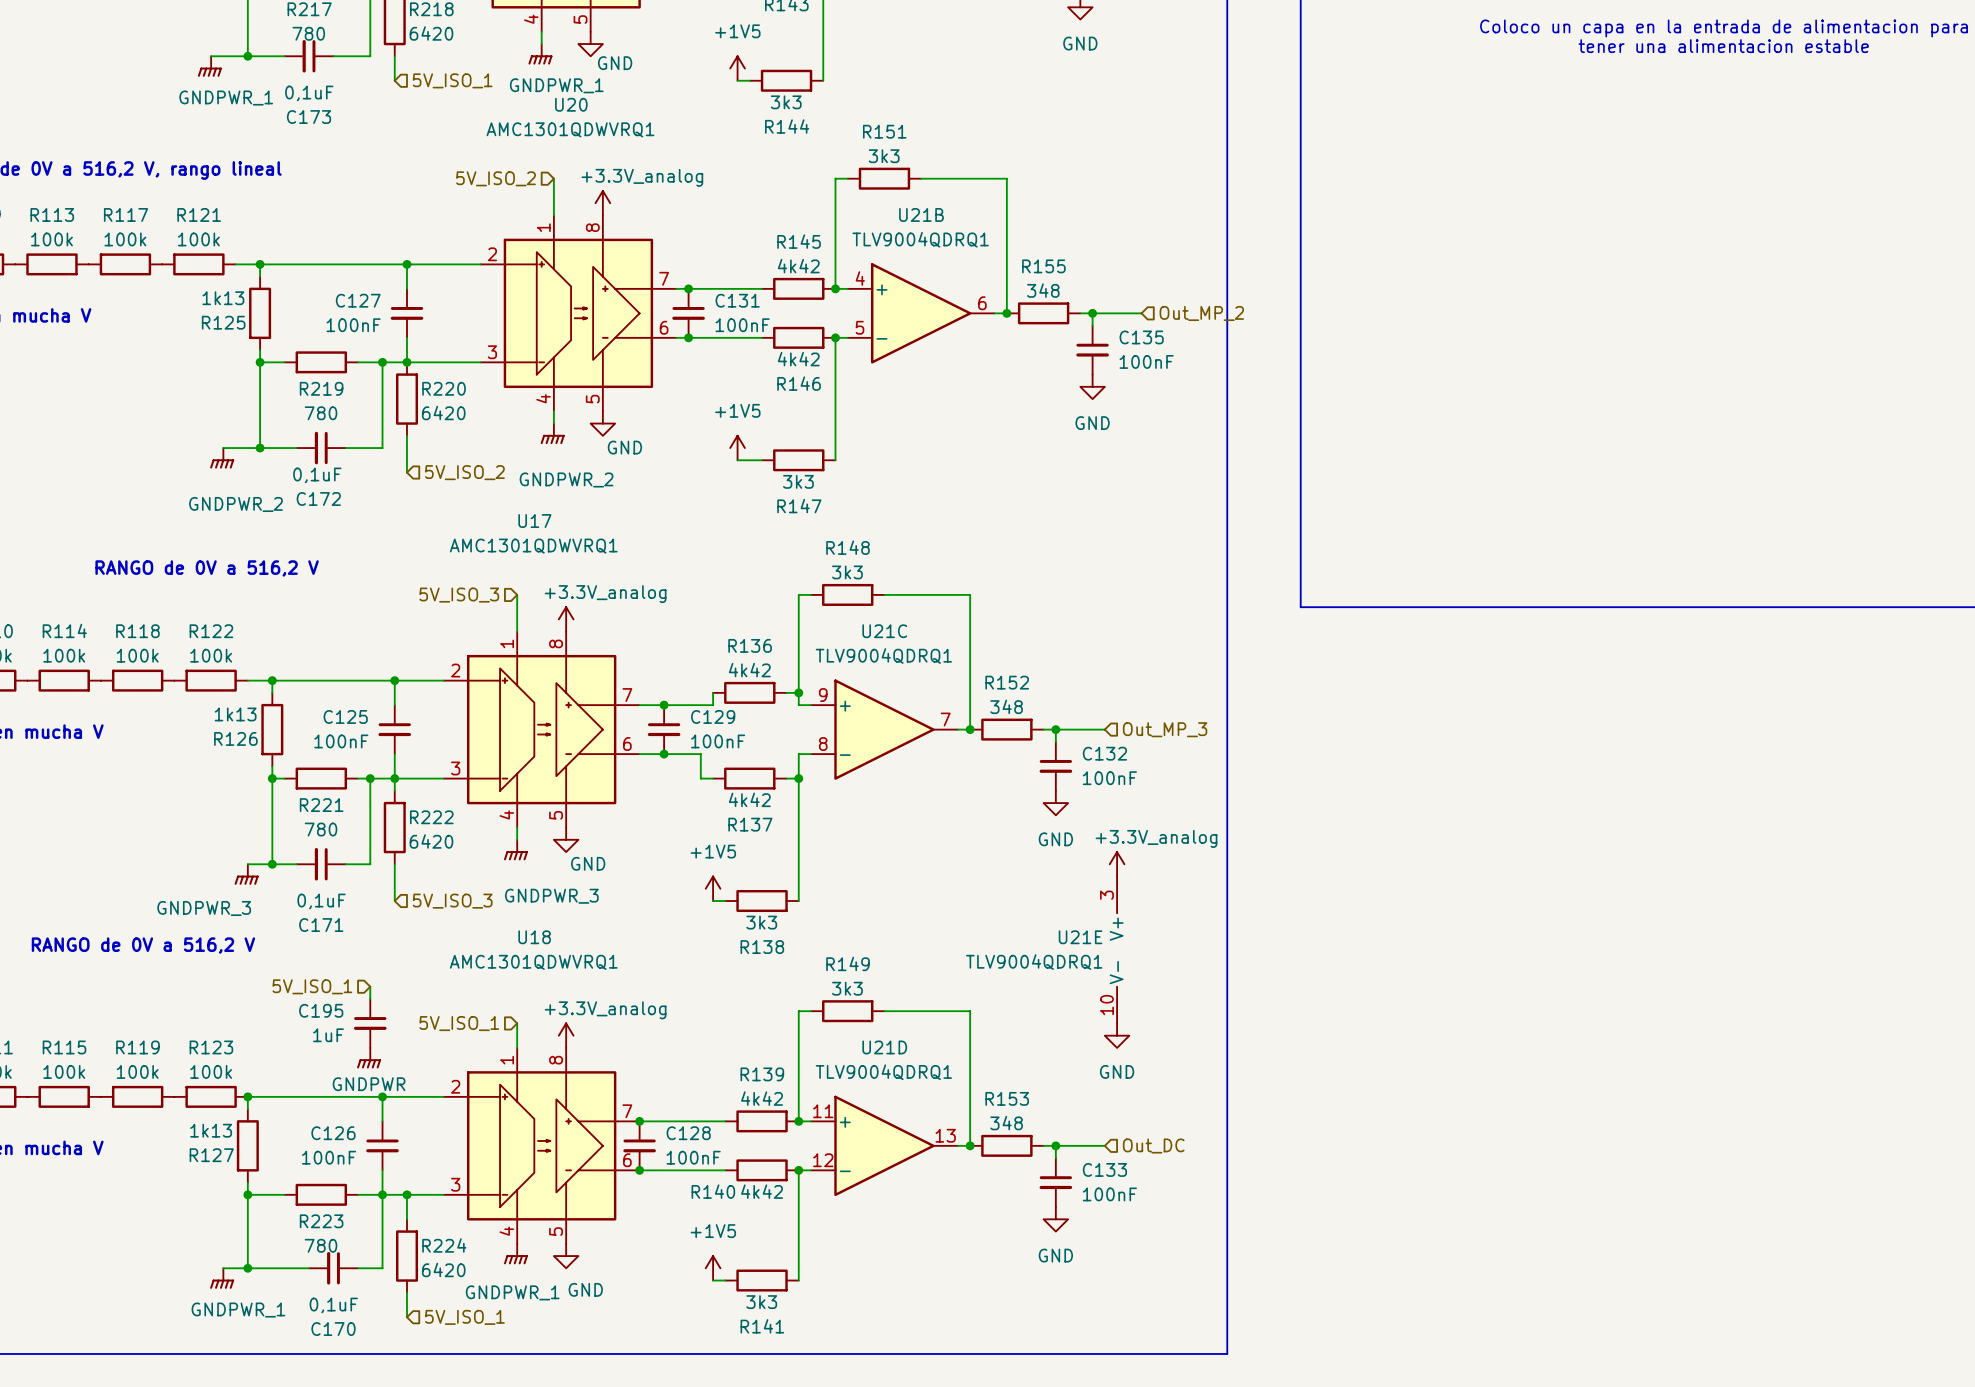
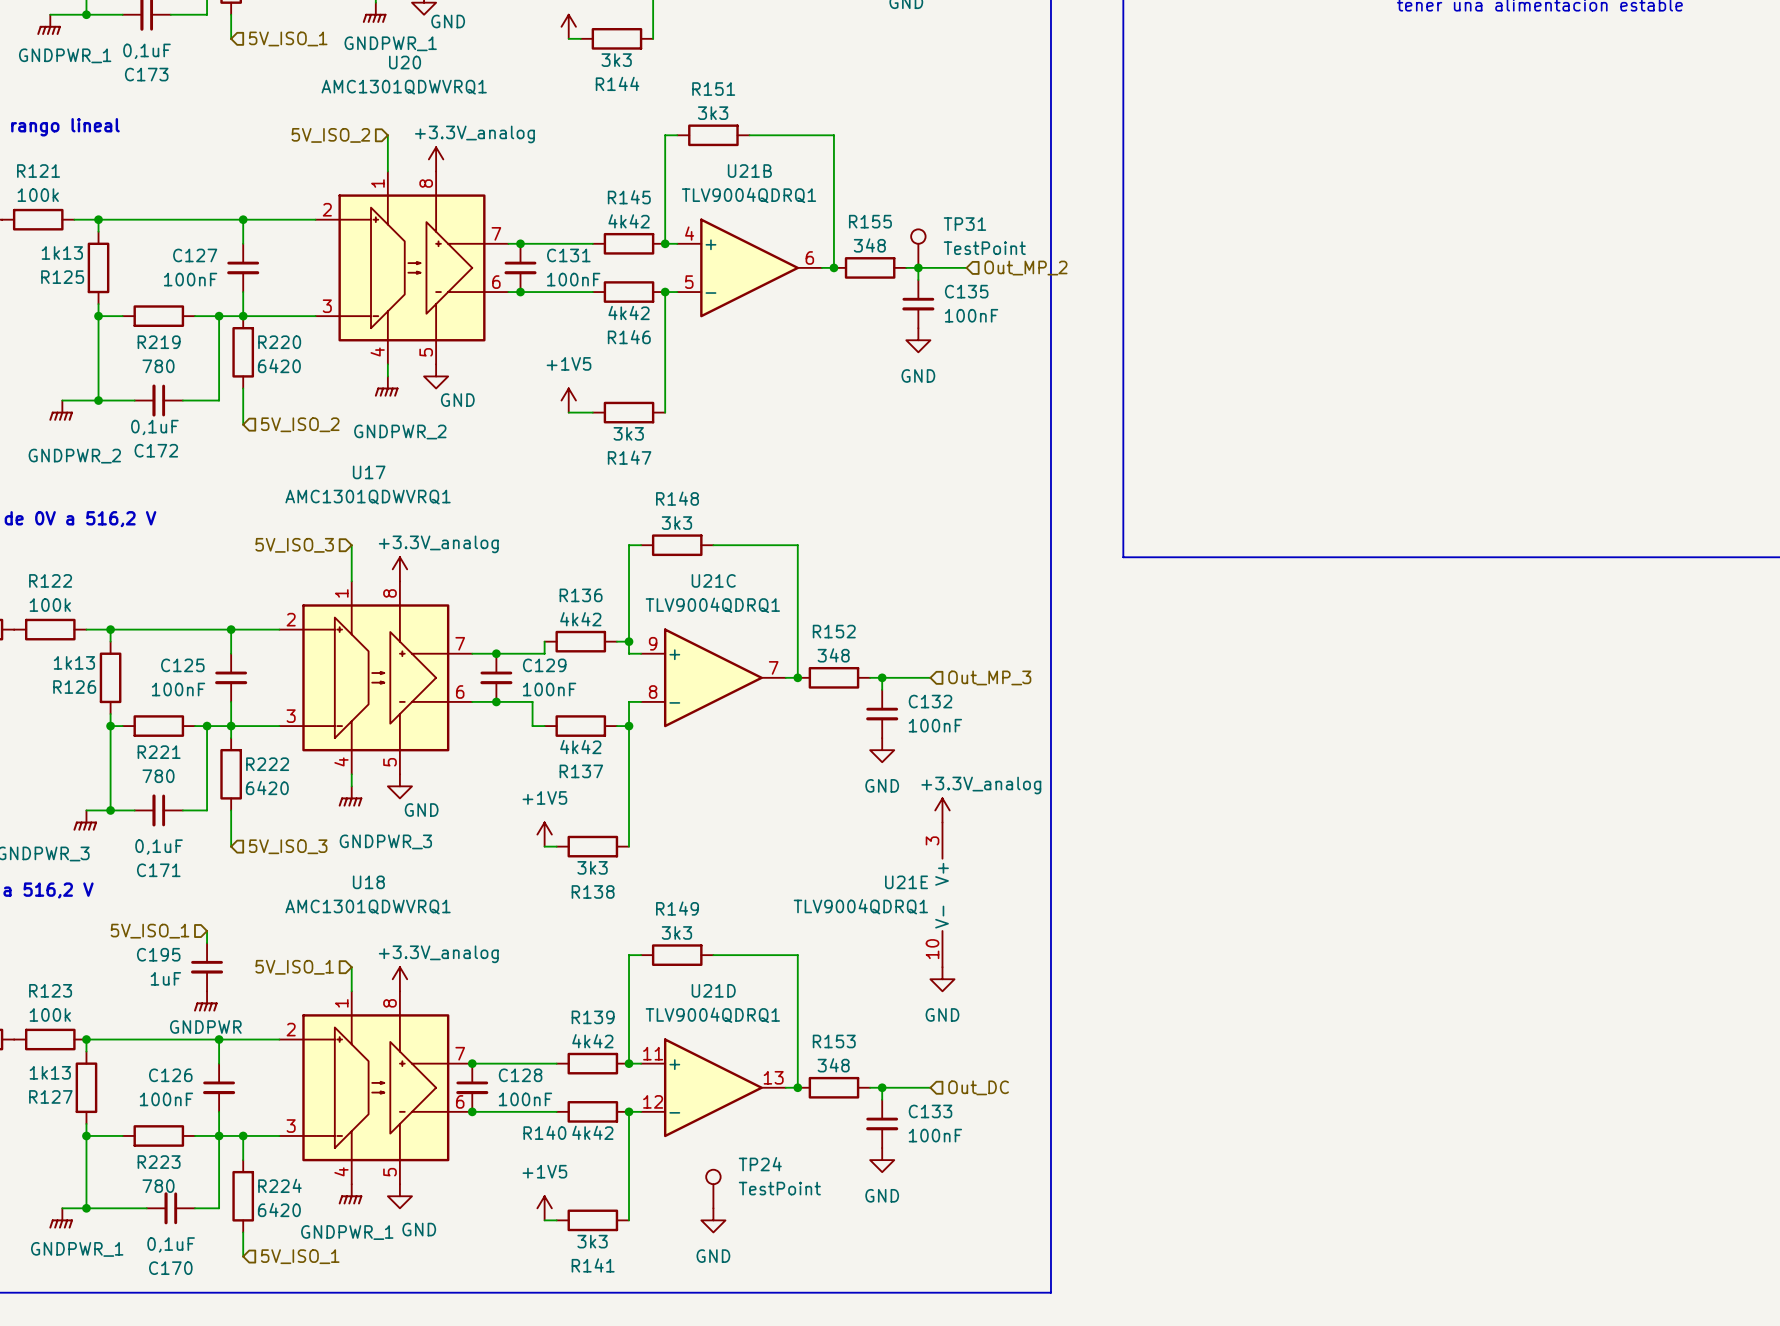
TP31: none -> TestPoint (918, 248)
TP24: none -> TestPoint (713, 1189)
power symbol: none -> GND (713, 1220)

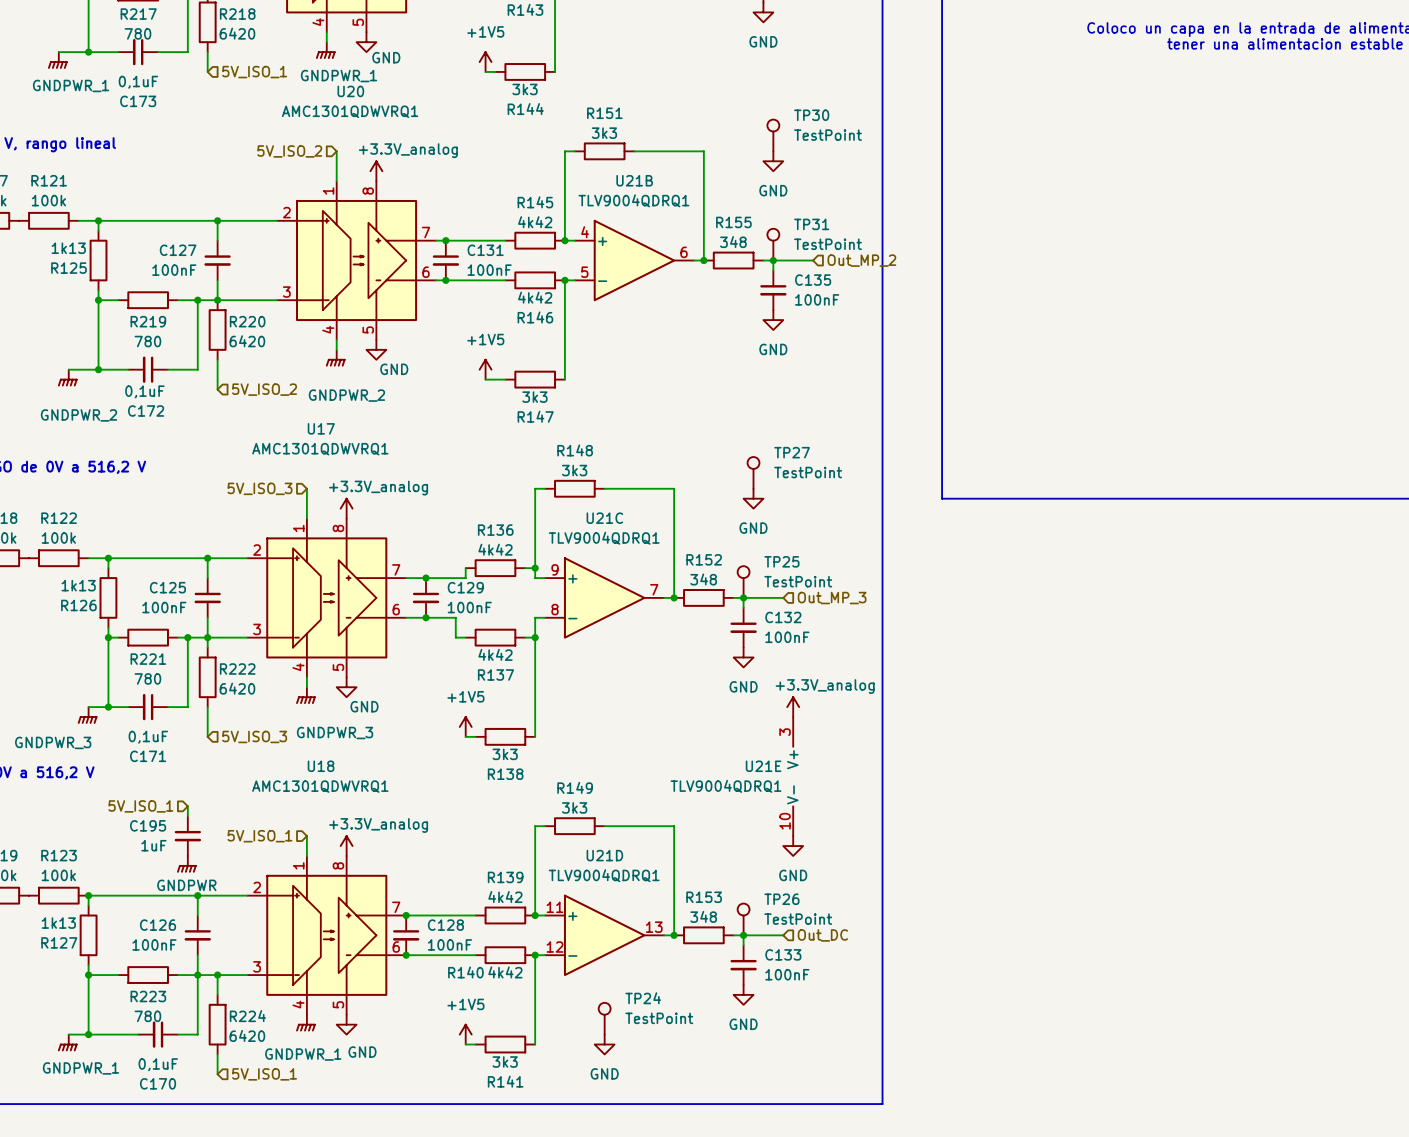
TP30: none -> TestPoint (773, 135)
power symbol: none -> GND (773, 161)
TP27: none -> TestPoint (753, 472)
power symbol: none -> GND (753, 498)
TP25: none -> TestPoint (743, 582)
TP26: none -> TestPoint (743, 919)

